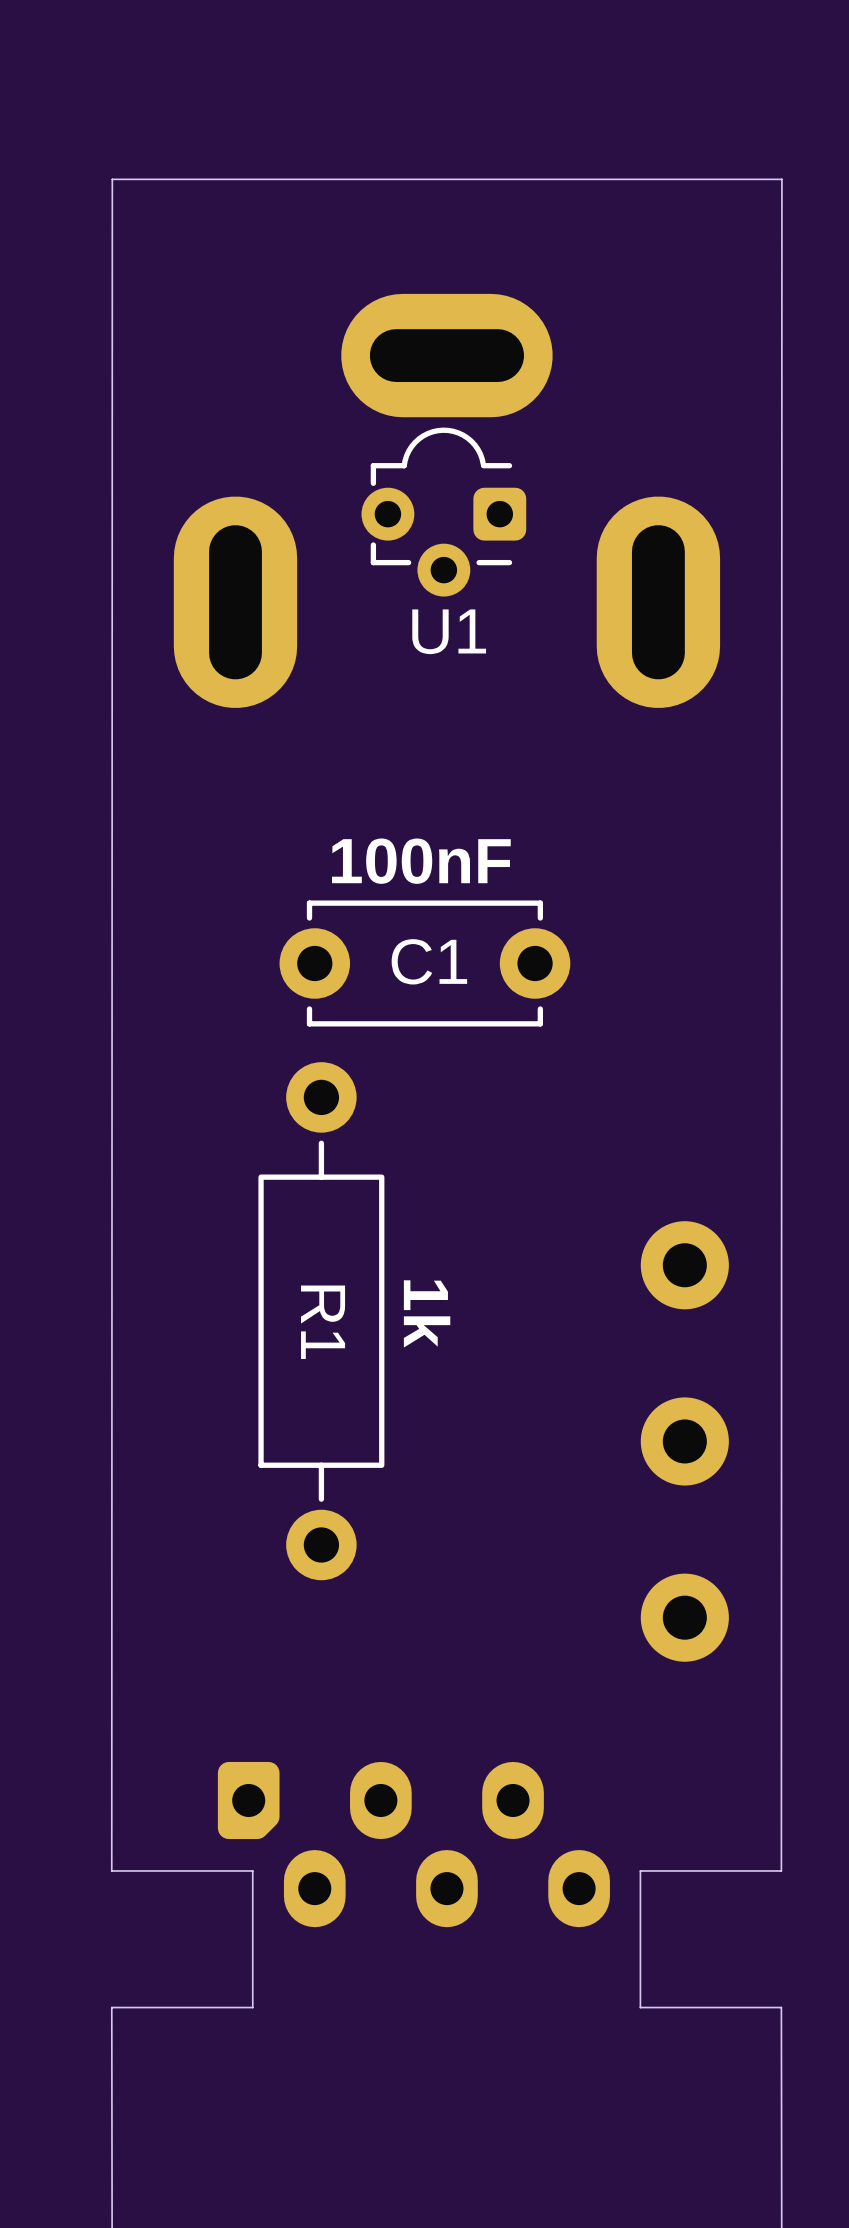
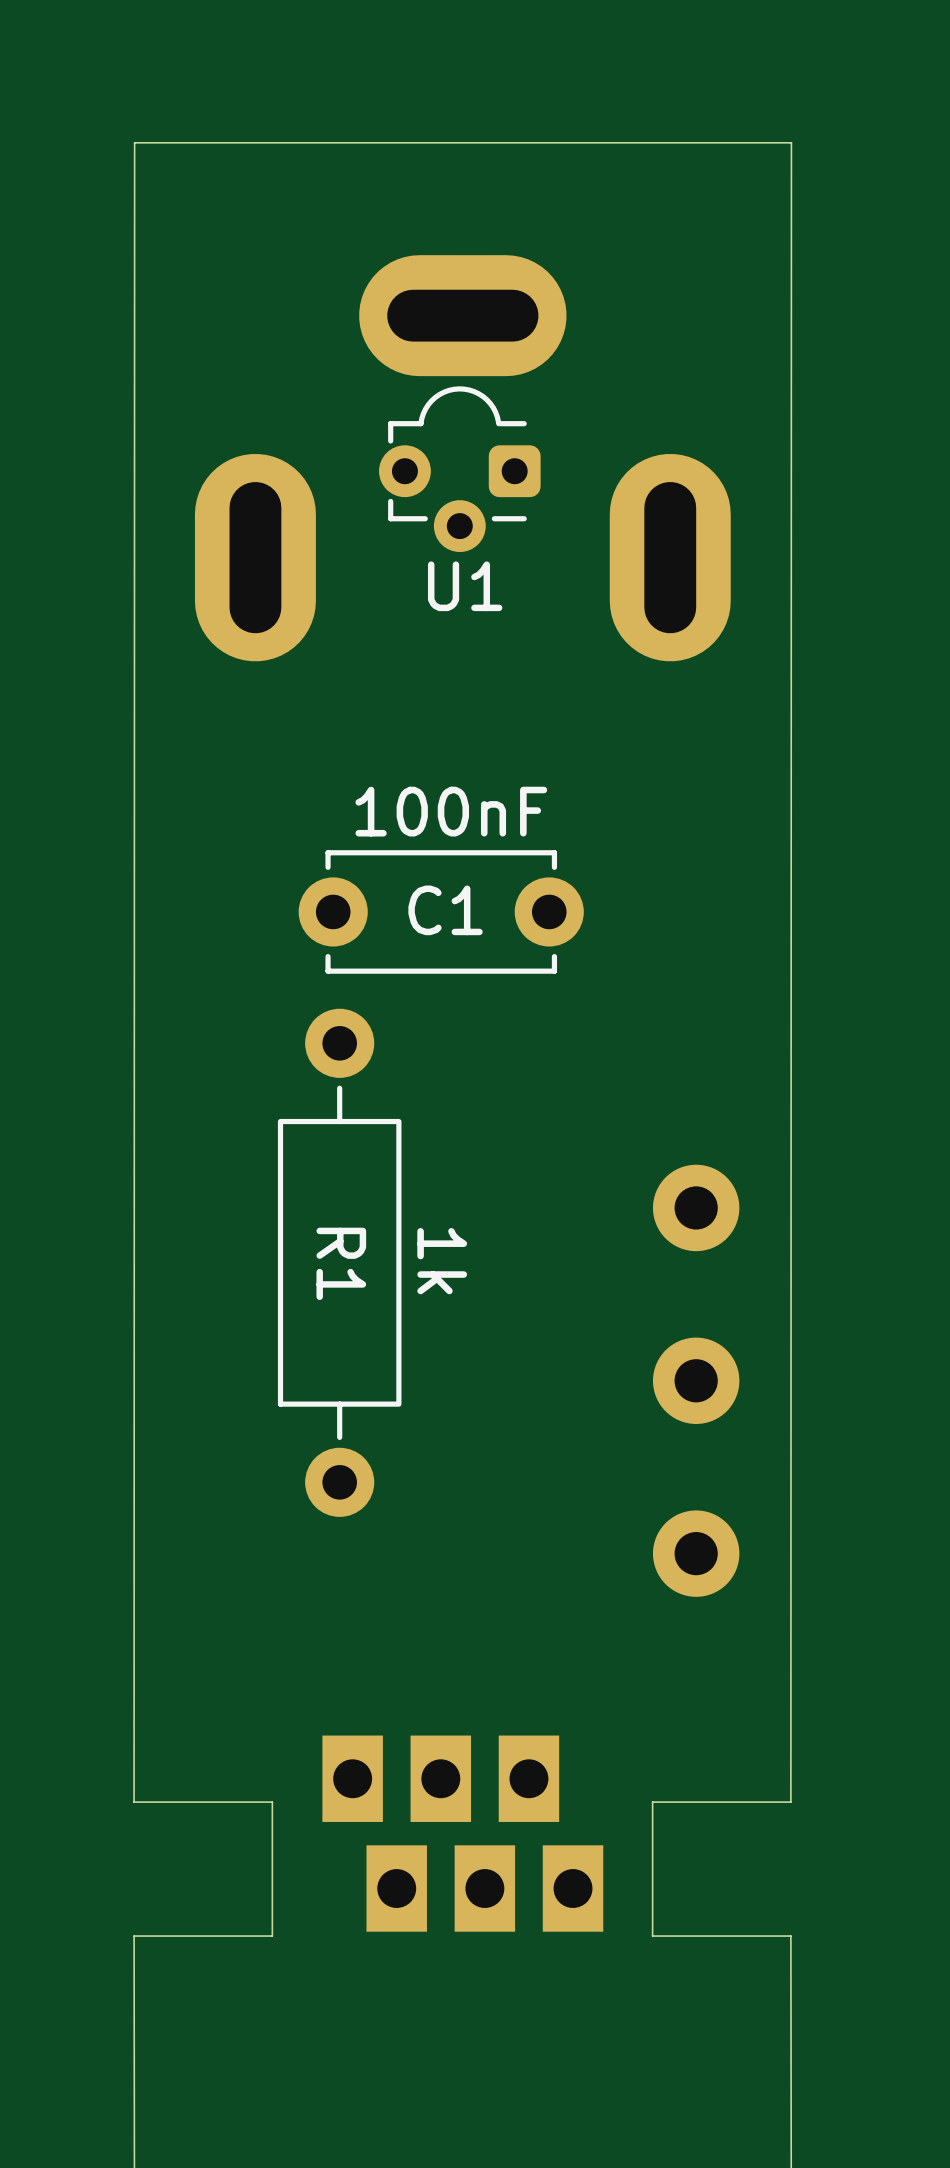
part: (413, 1844) -> none
part: none -> (462, 1833)

